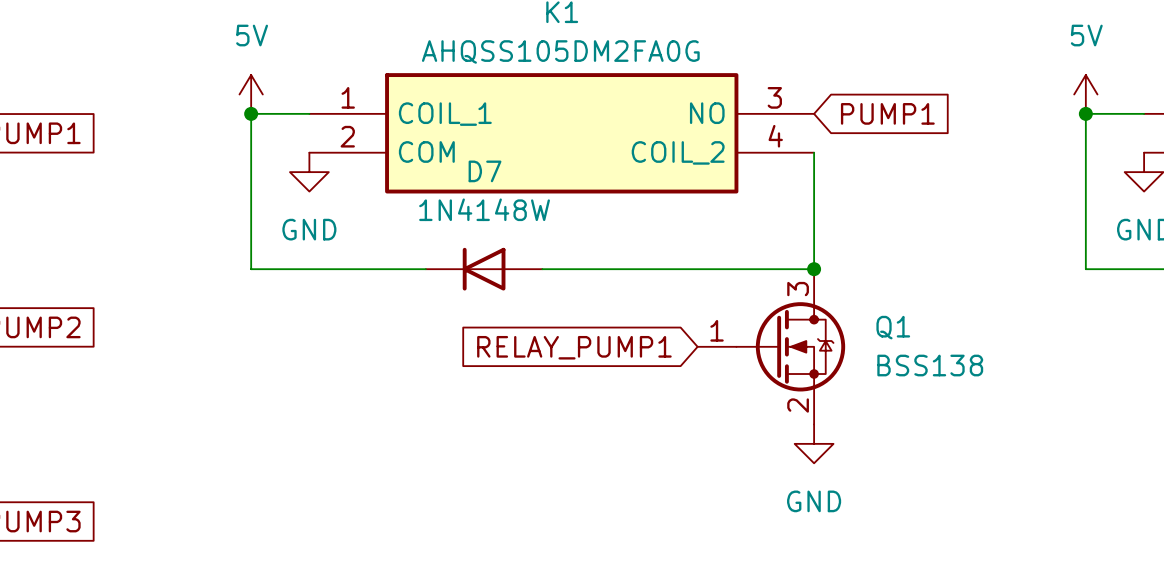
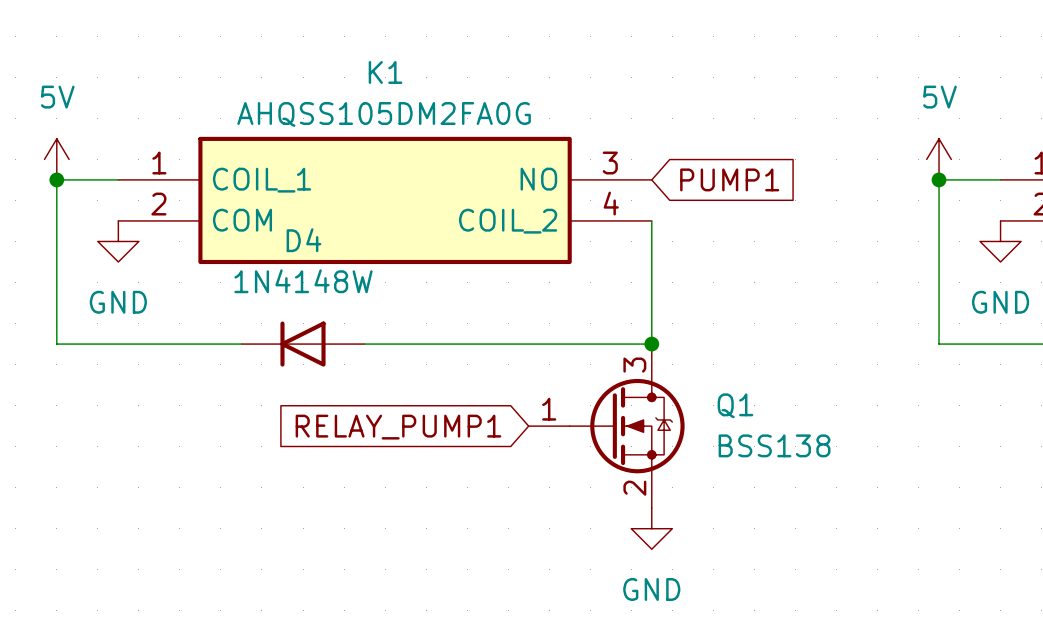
D7 name: D7 (485, 171) -> D4 (303, 240)

